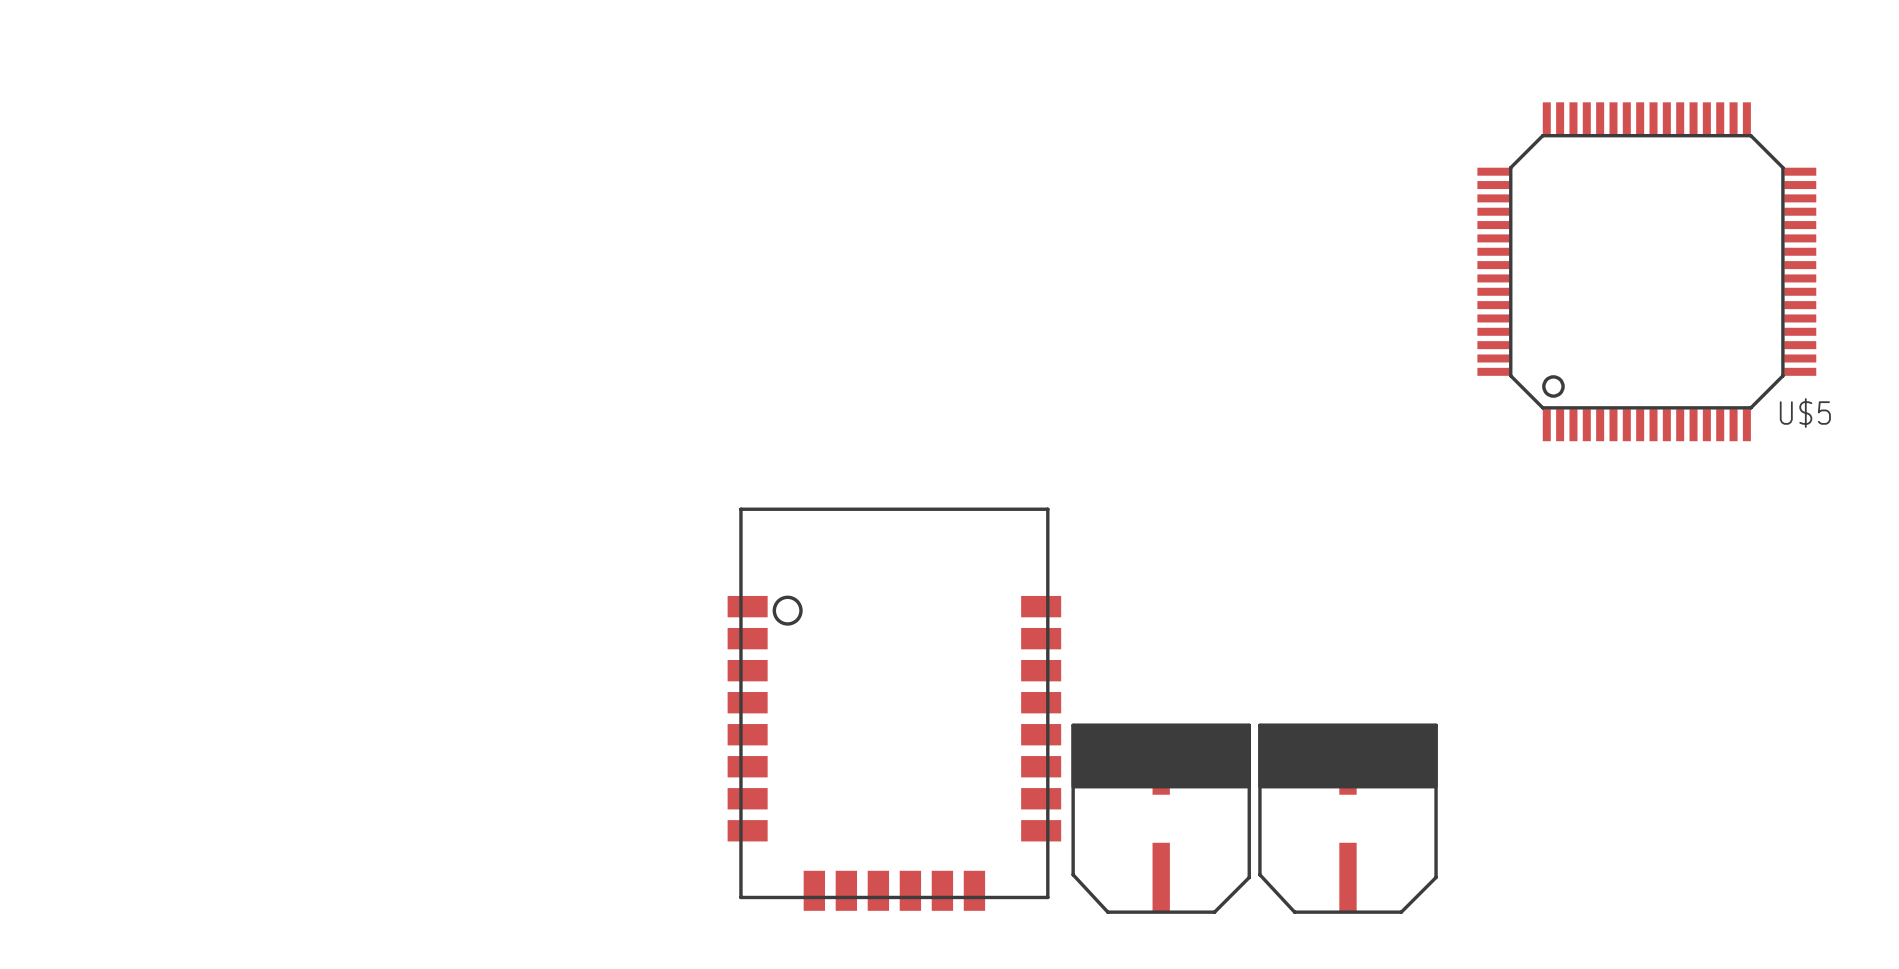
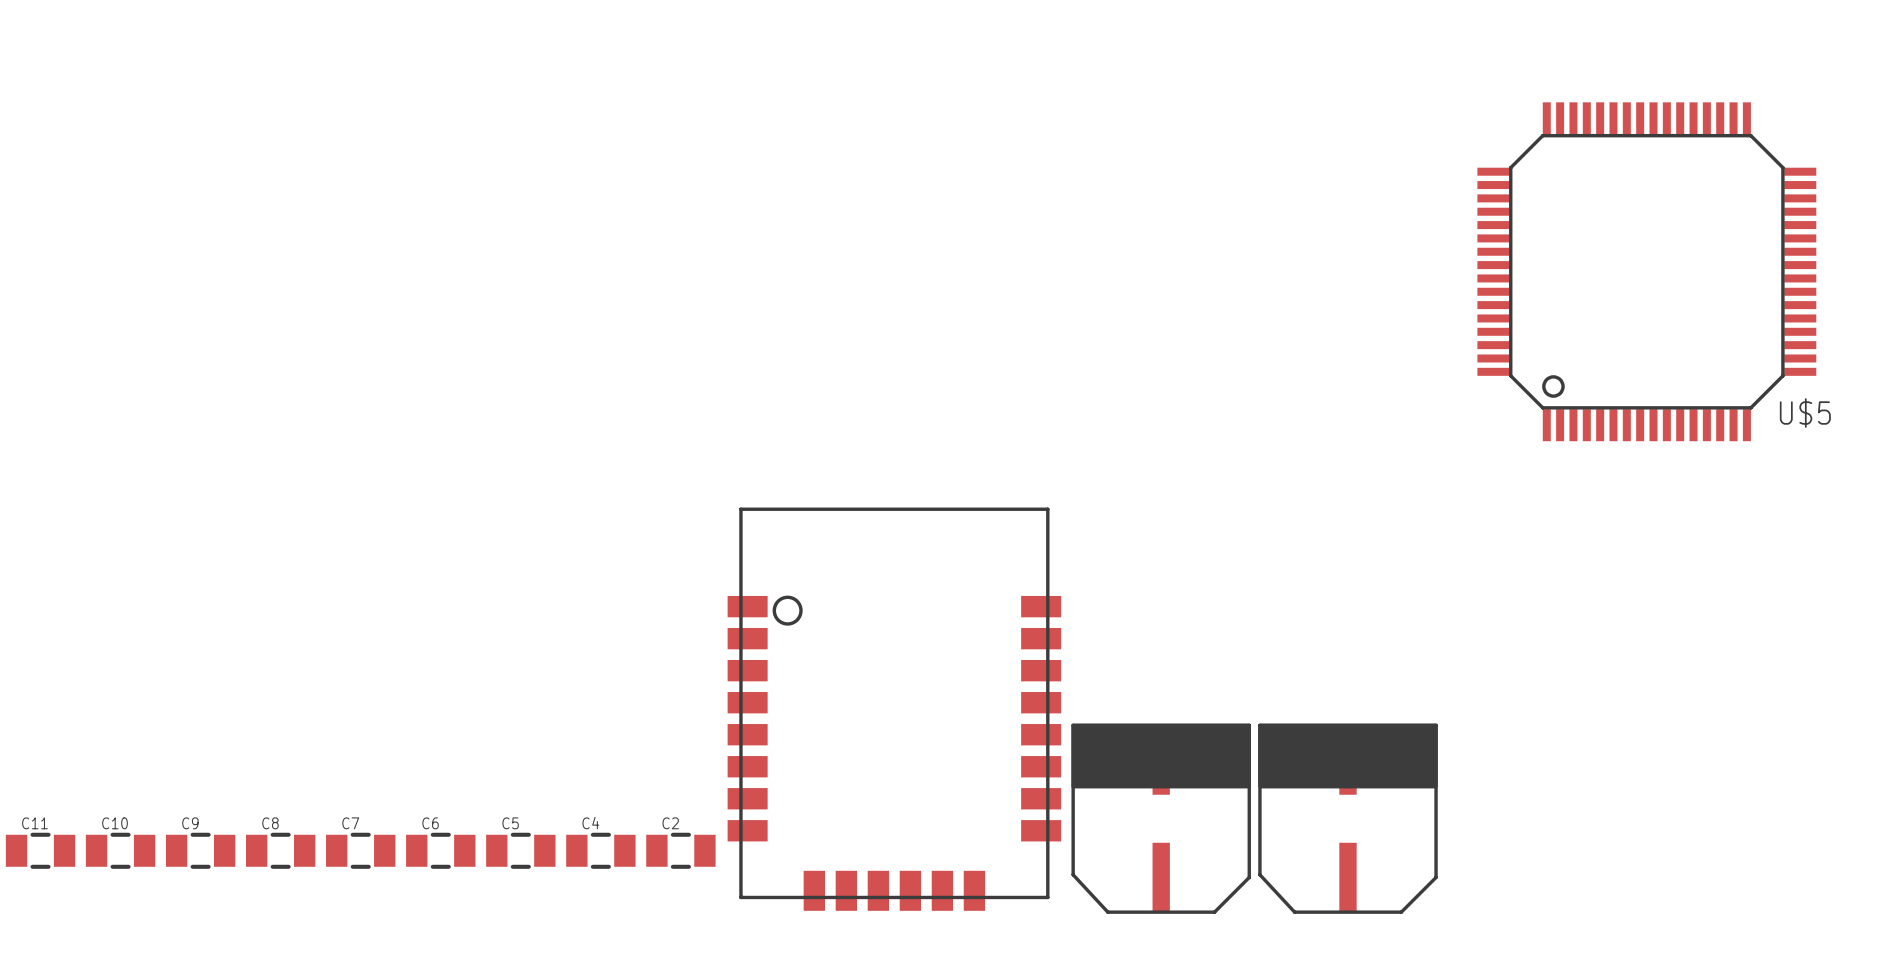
C11: none -> (40, 850)
C10: none -> (120, 850)
C9: none -> (200, 850)
C8: none -> (280, 850)
C7: none -> (360, 850)
C6: none -> (440, 850)
C5: none -> (520, 850)
C4: none -> (600, 850)
C2: none -> (680, 850)

